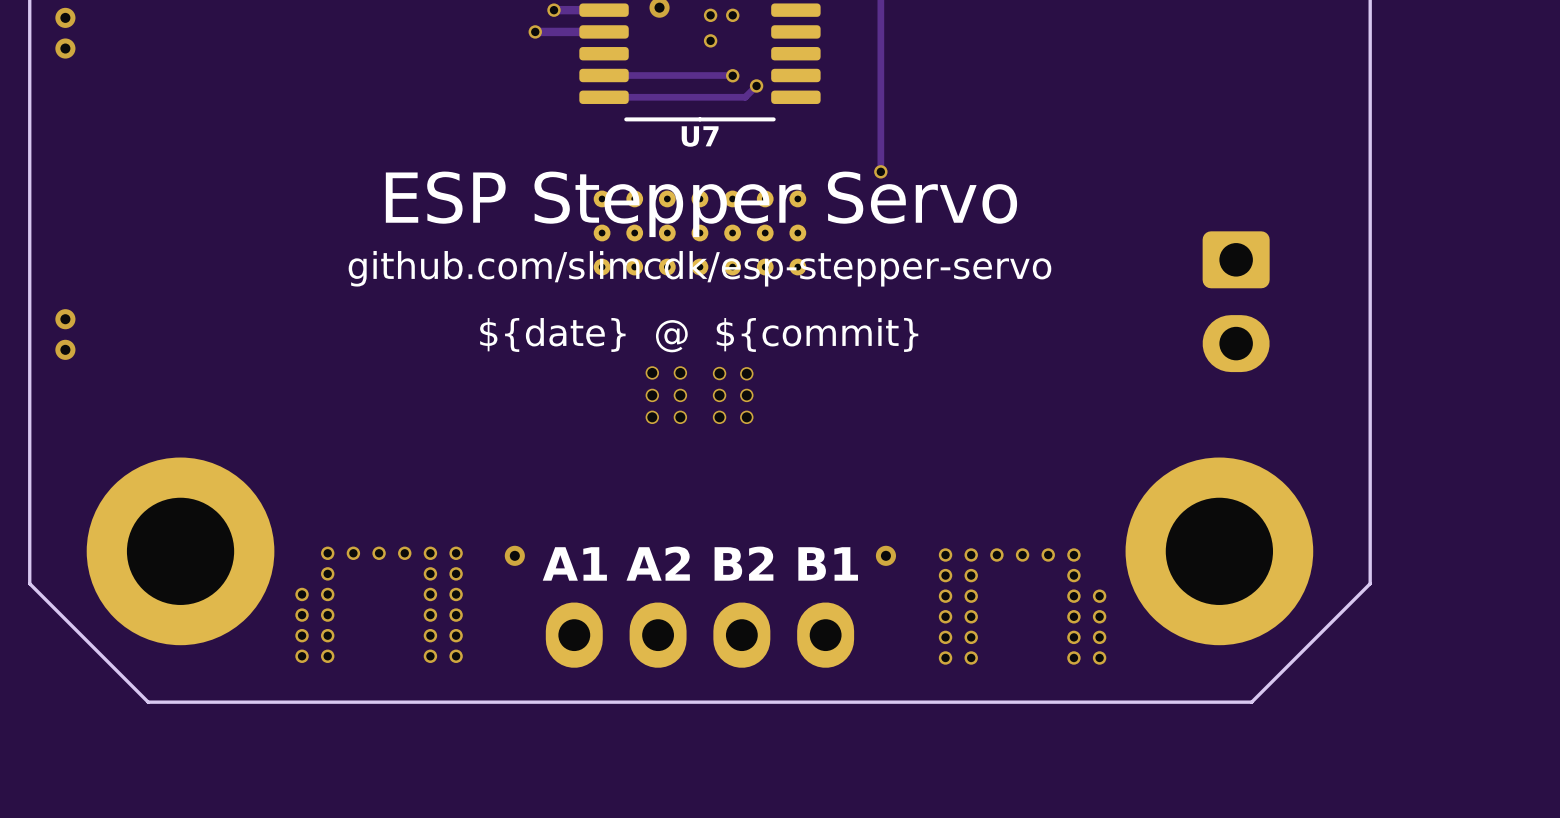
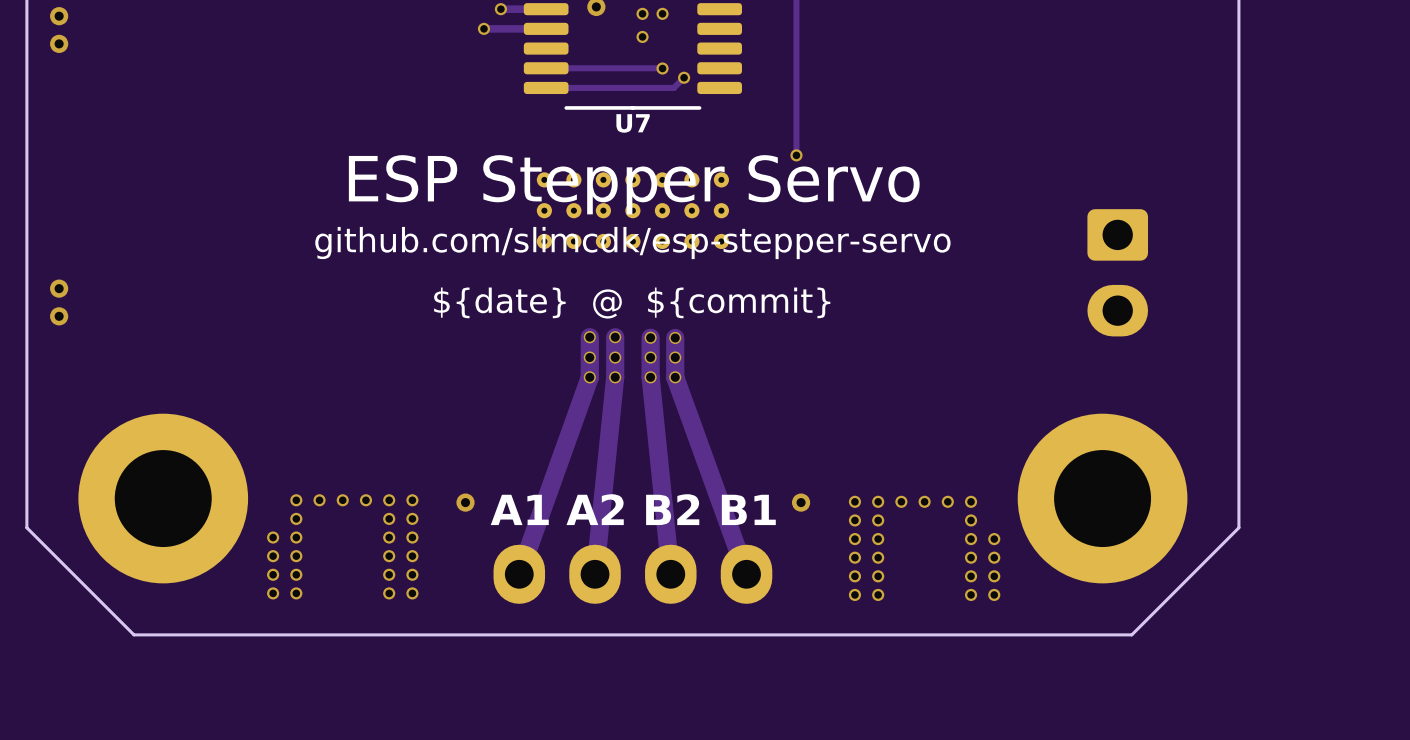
track: none -> (589, 337) (589, 377) (519, 574)
track: none -> (615, 337) (615, 377) (595, 574)
track: none -> (650, 337) (650, 377) (670, 574)
track: none -> (675, 337) (675, 377) (746, 574)

